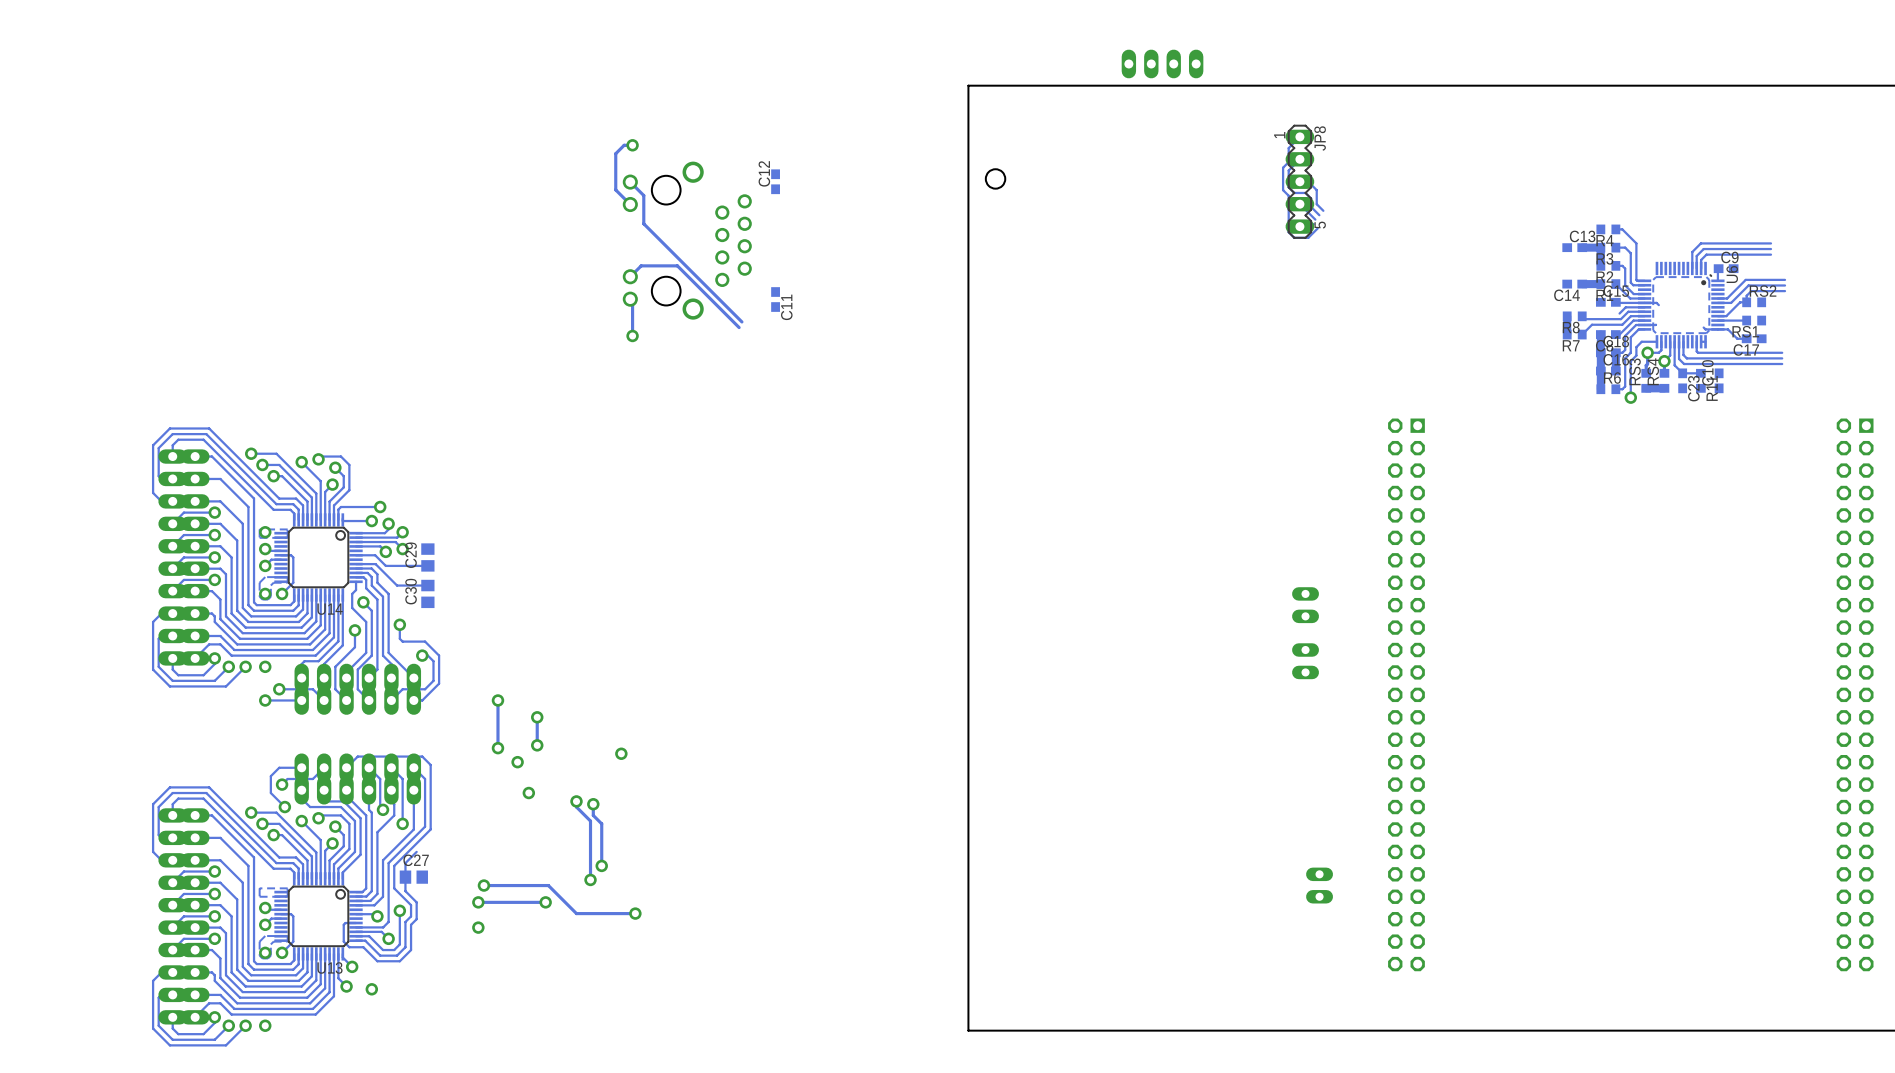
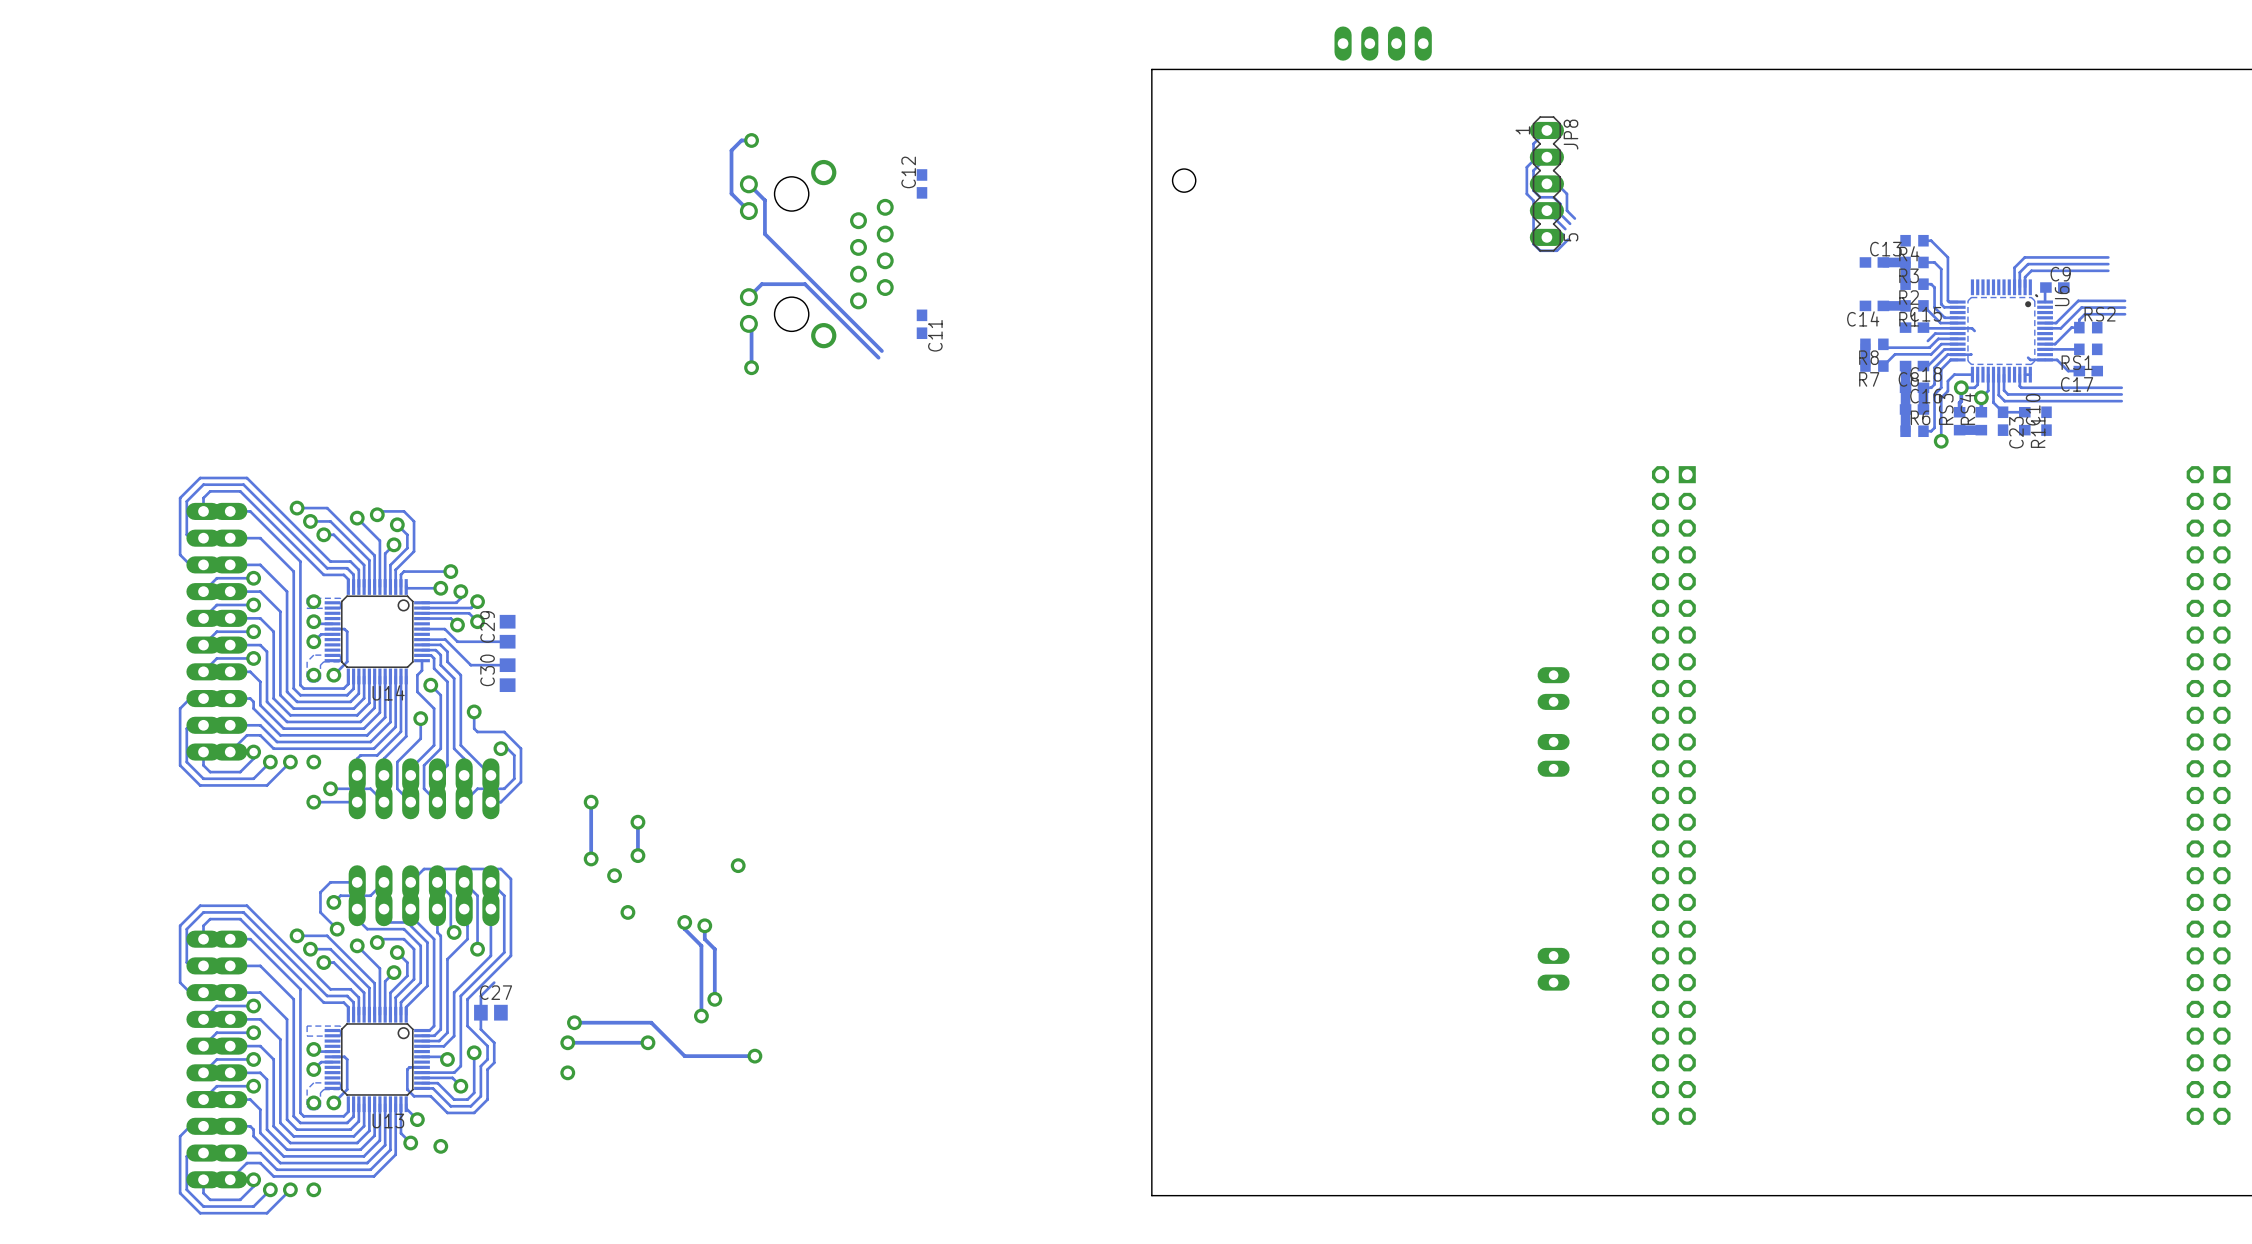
part position: (1319, 885) -> (1553, 969)

